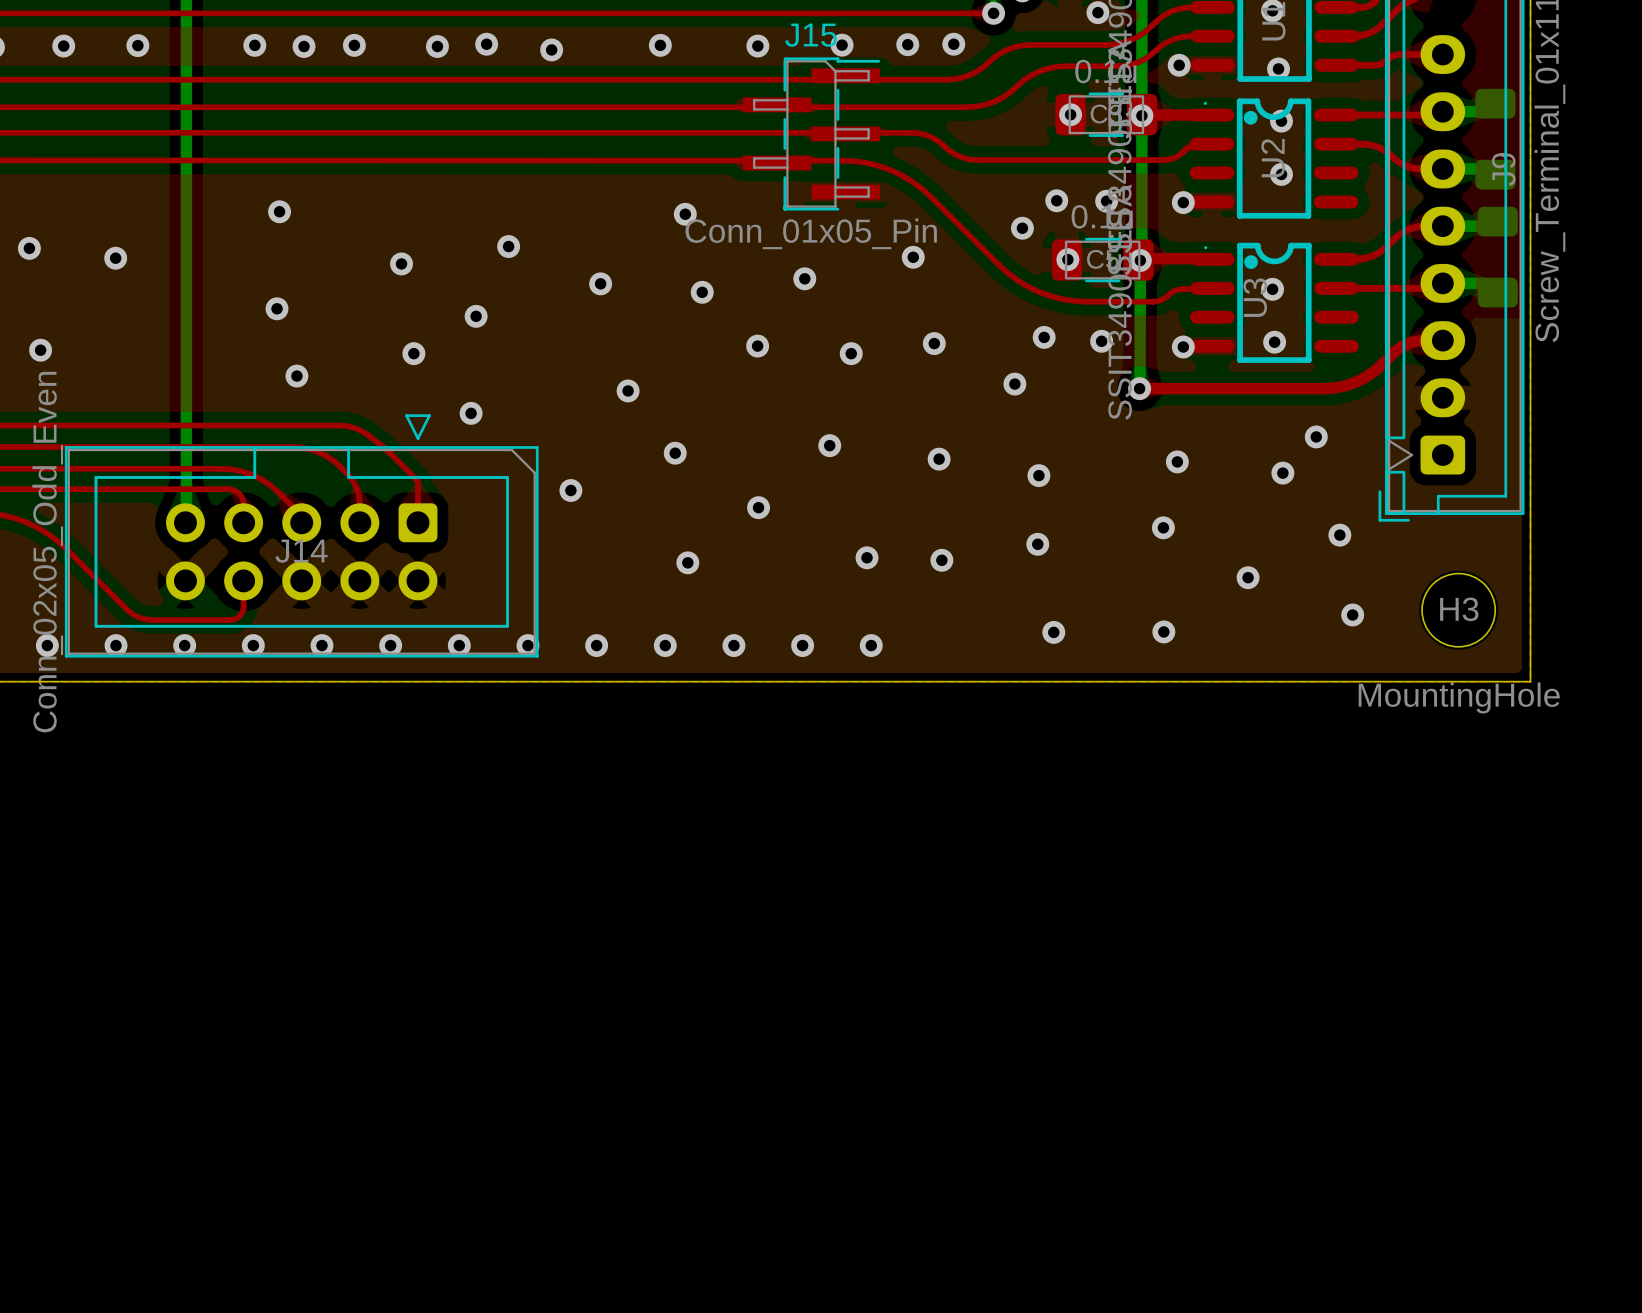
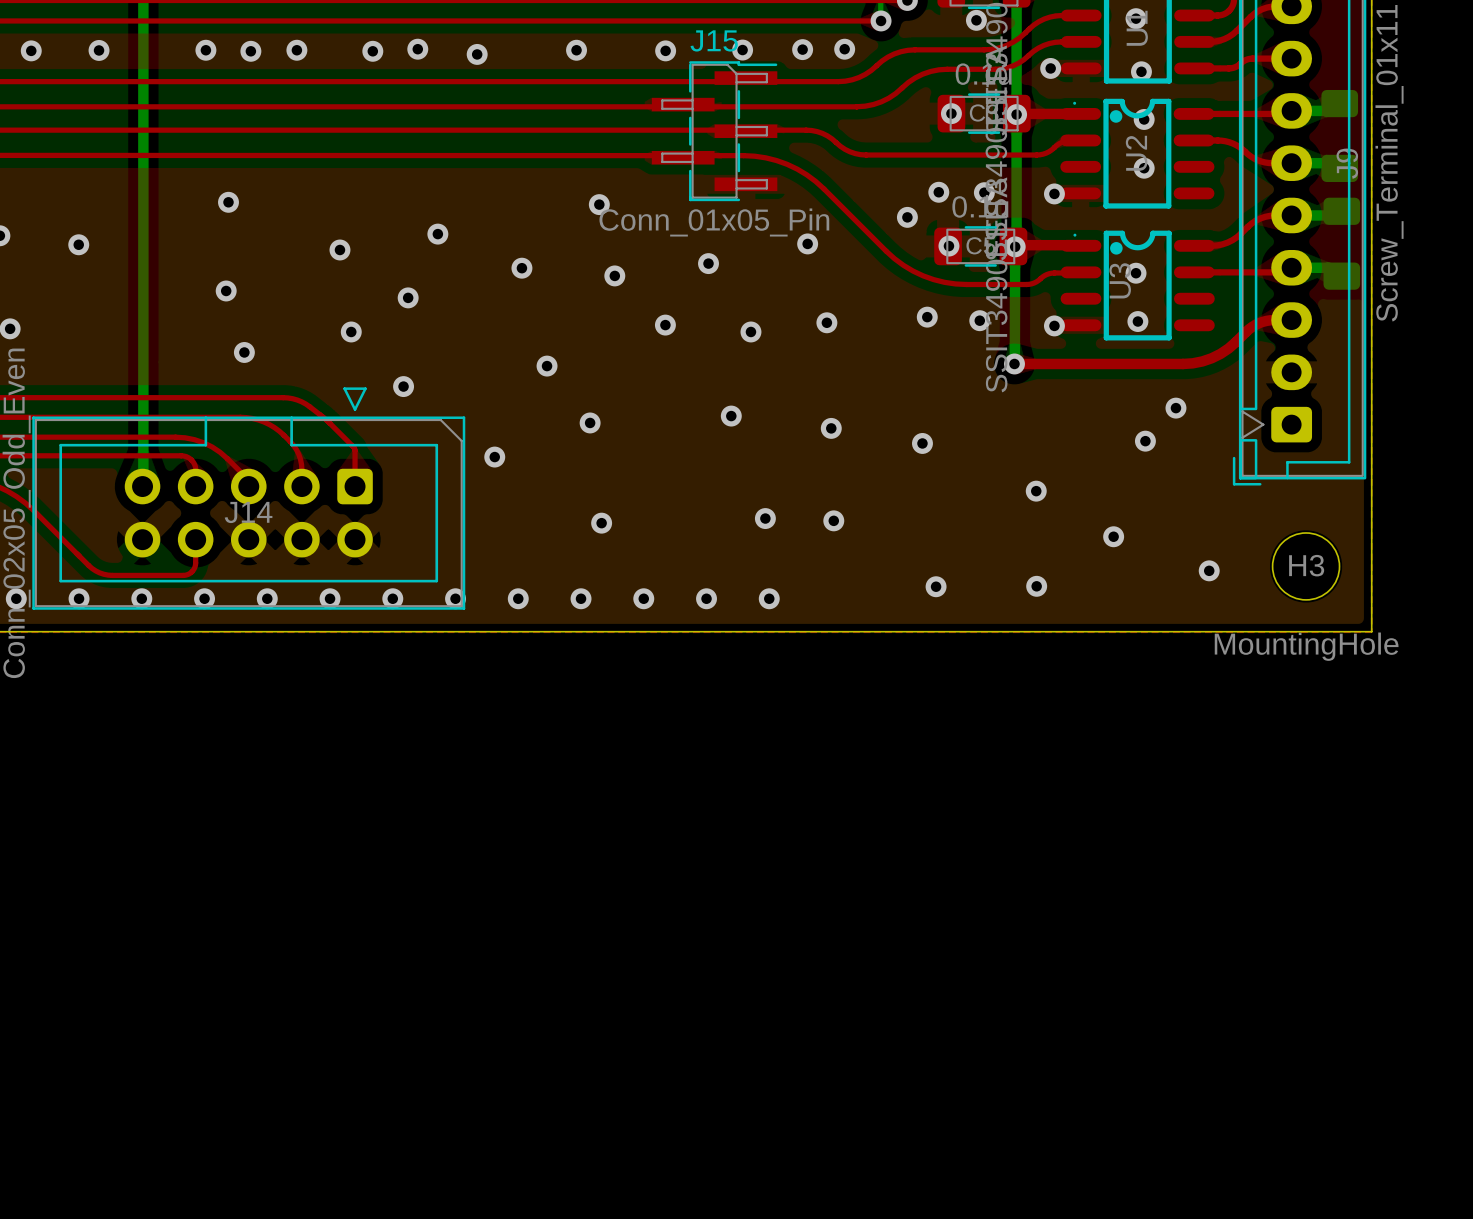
via: (1014, 384) -> none
via: (1177, 461) -> none
via: (758, 507) -> none
via: (1339, 535) -> none
via: (1037, 544) -> none

